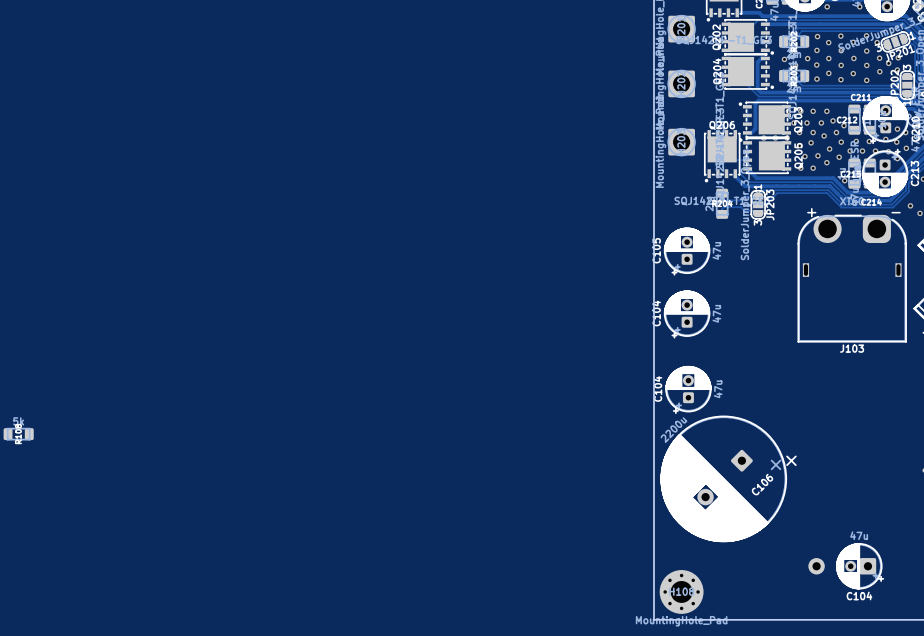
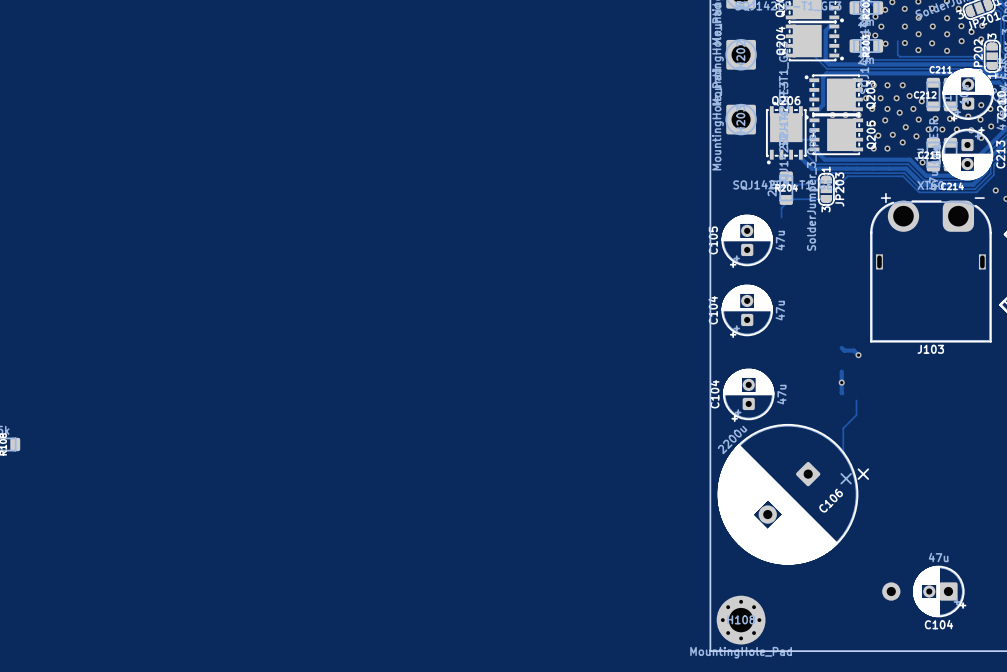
via: none -> (885, 9)
via: none -> (875, 16)
via: (816, 50) -> none
via: (784, 59) -> none
via: (816, 65) -> none
via: none -> (875, 35)
via: none -> (885, 43)
track: (804, 76) (800, 74) (797, 77) (797, 81) (802, 85) (824, 85) -> (897, 41) (897, 54) (899, 56)
via: (816, 79) -> none
track: (758, 213) (755, 210) (744, 210) (741, 207) (723, 207) (722, 214) -> (826, 199) (790, 199) (781, 208) (781, 217)
track: none -> (841, 347) (844, 350) (853, 350) (858, 355)
via: none -> (858, 355)
track: none -> (841, 371) (842, 393)
via: none -> (841, 382)
track: none -> (856, 400) (856, 415) (843, 428) (843, 452)

